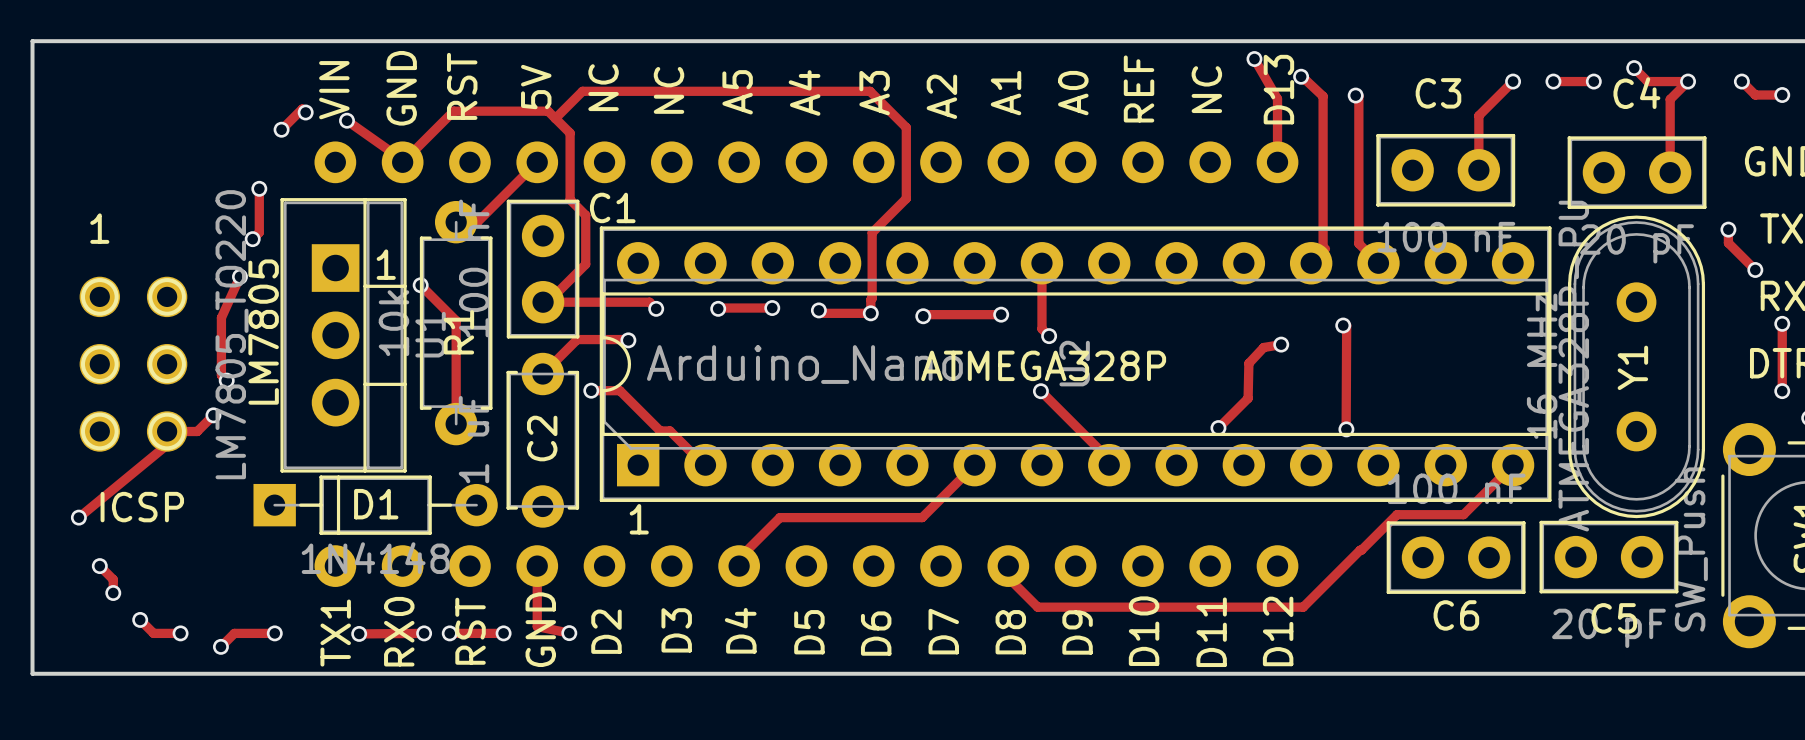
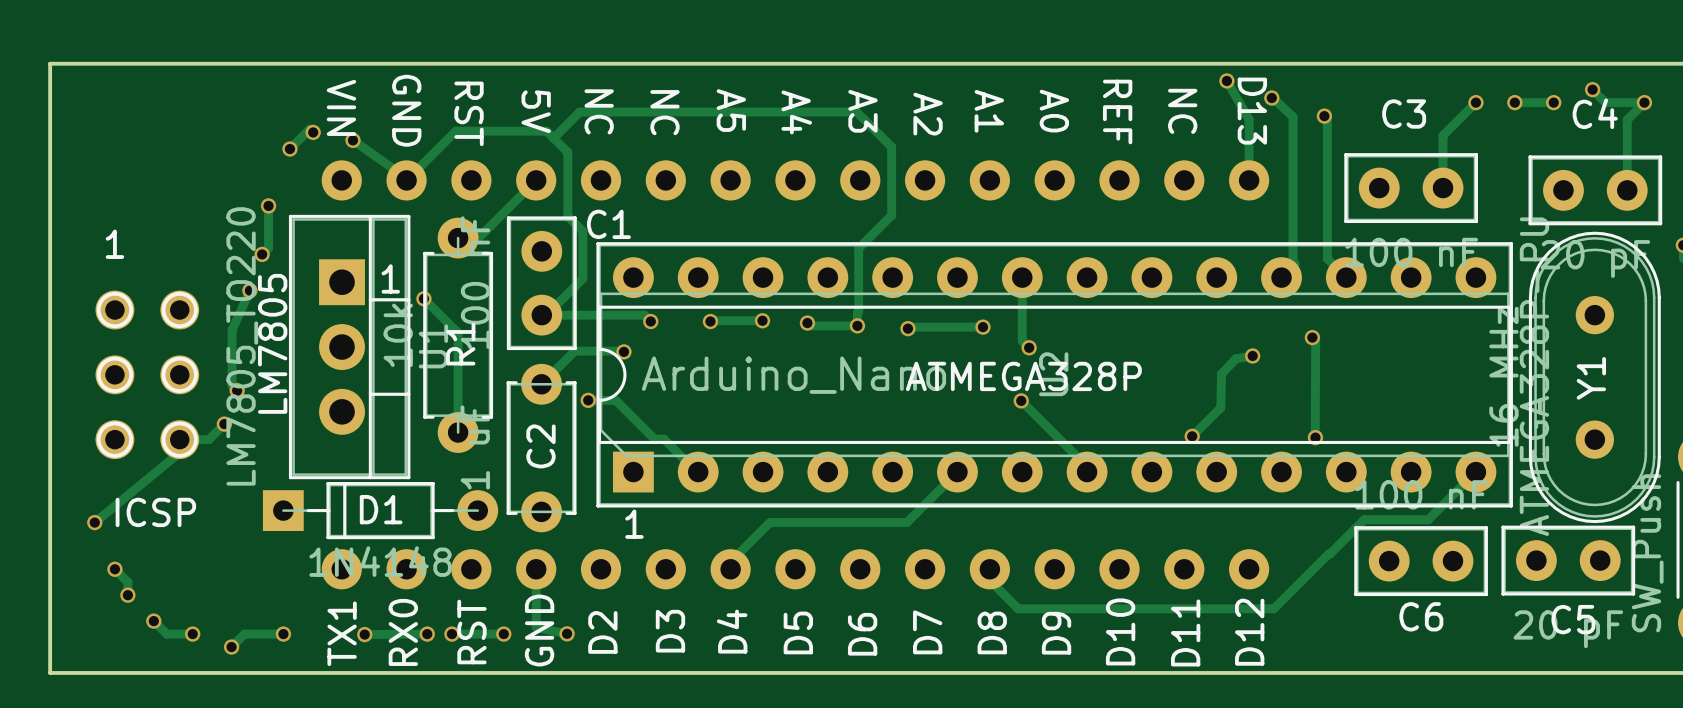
text rotation: 0° (462, 86) -> 180° (469, 113)
text rotation: 0° (536, 87) -> 180° (536, 111)
text rotation: 0° (603, 87) -> 180° (599, 111)
text rotation: 0° (401, 88) -> 180° (406, 110)
text rotation: 0° (1139, 88) -> 180° (1117, 111)
text rotation: 0° (1206, 89) -> 180° (1182, 111)
text rotation: 0° (1278, 89) -> 180° (1252, 111)
text rotation: 0° (334, 90) -> 180° (341, 107)
text rotation: 0° (668, 90) -> 180° (664, 112)
text rotation: 0° (737, 92) -> 180° (731, 110)
text rotation: 0° (804, 92) -> 180° (796, 112)
text rotation: 0° (874, 93) -> 180° (862, 111)
text rotation: 0° (1006, 93) -> 180° (989, 111)
text rotation: 0° (1073, 93) -> 180° (1054, 111)
text rotation: 0° (941, 96) -> 180° (928, 114)

